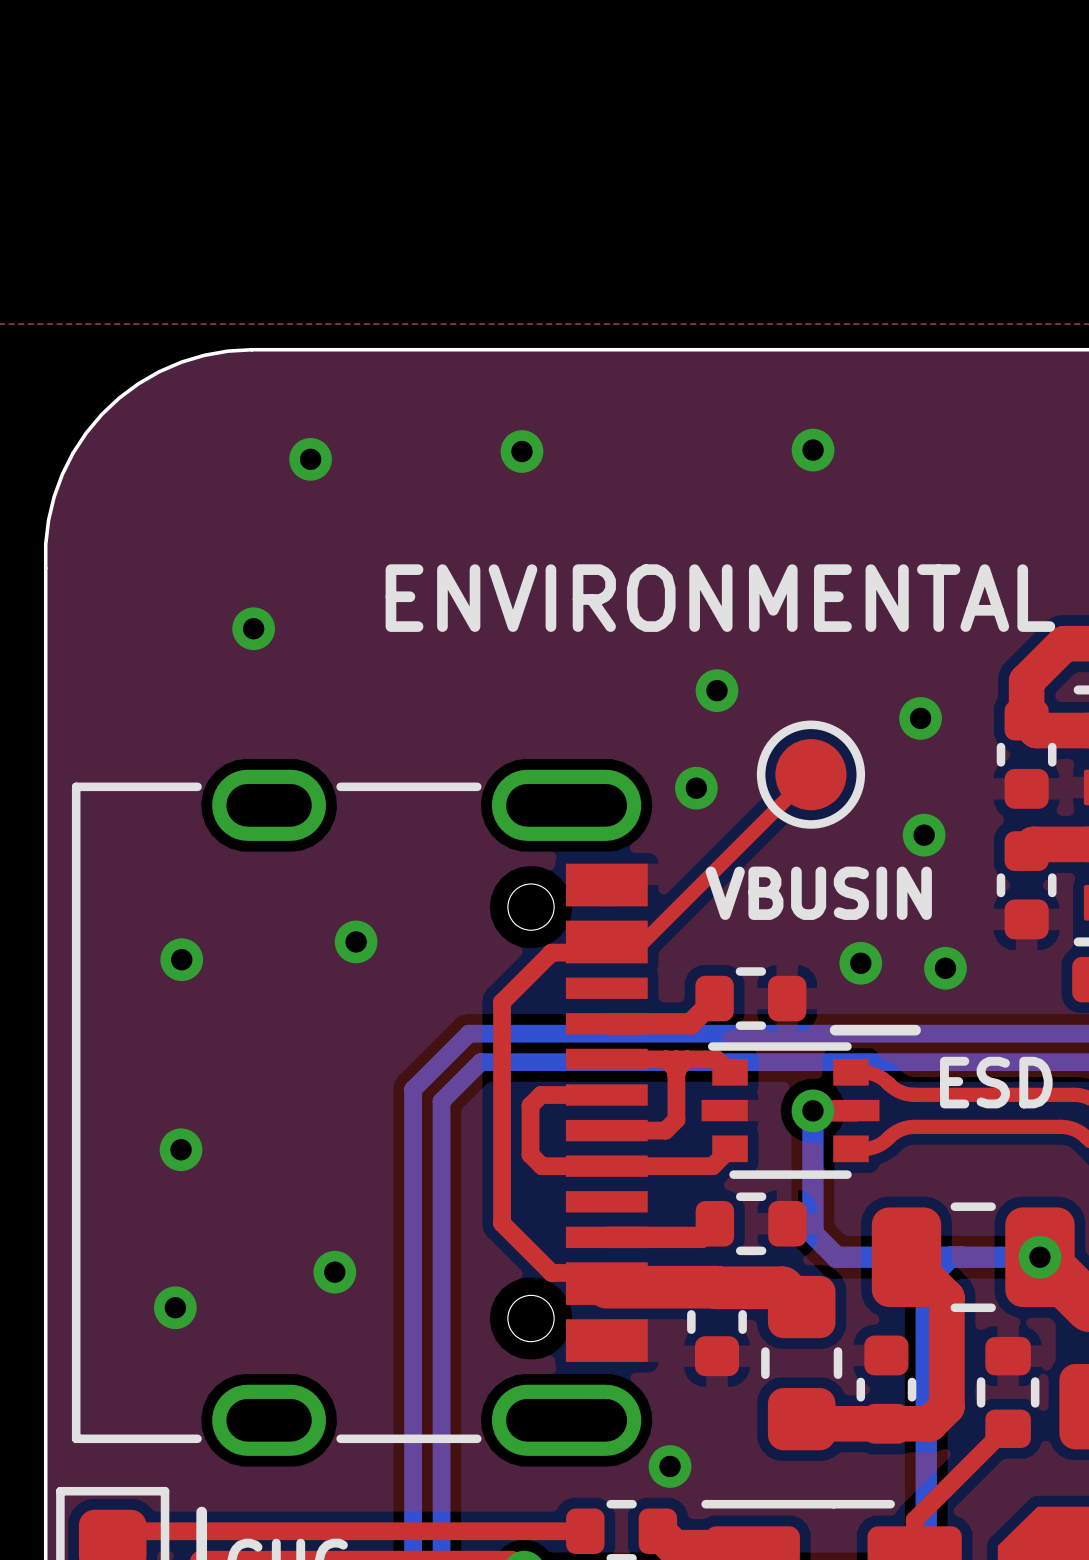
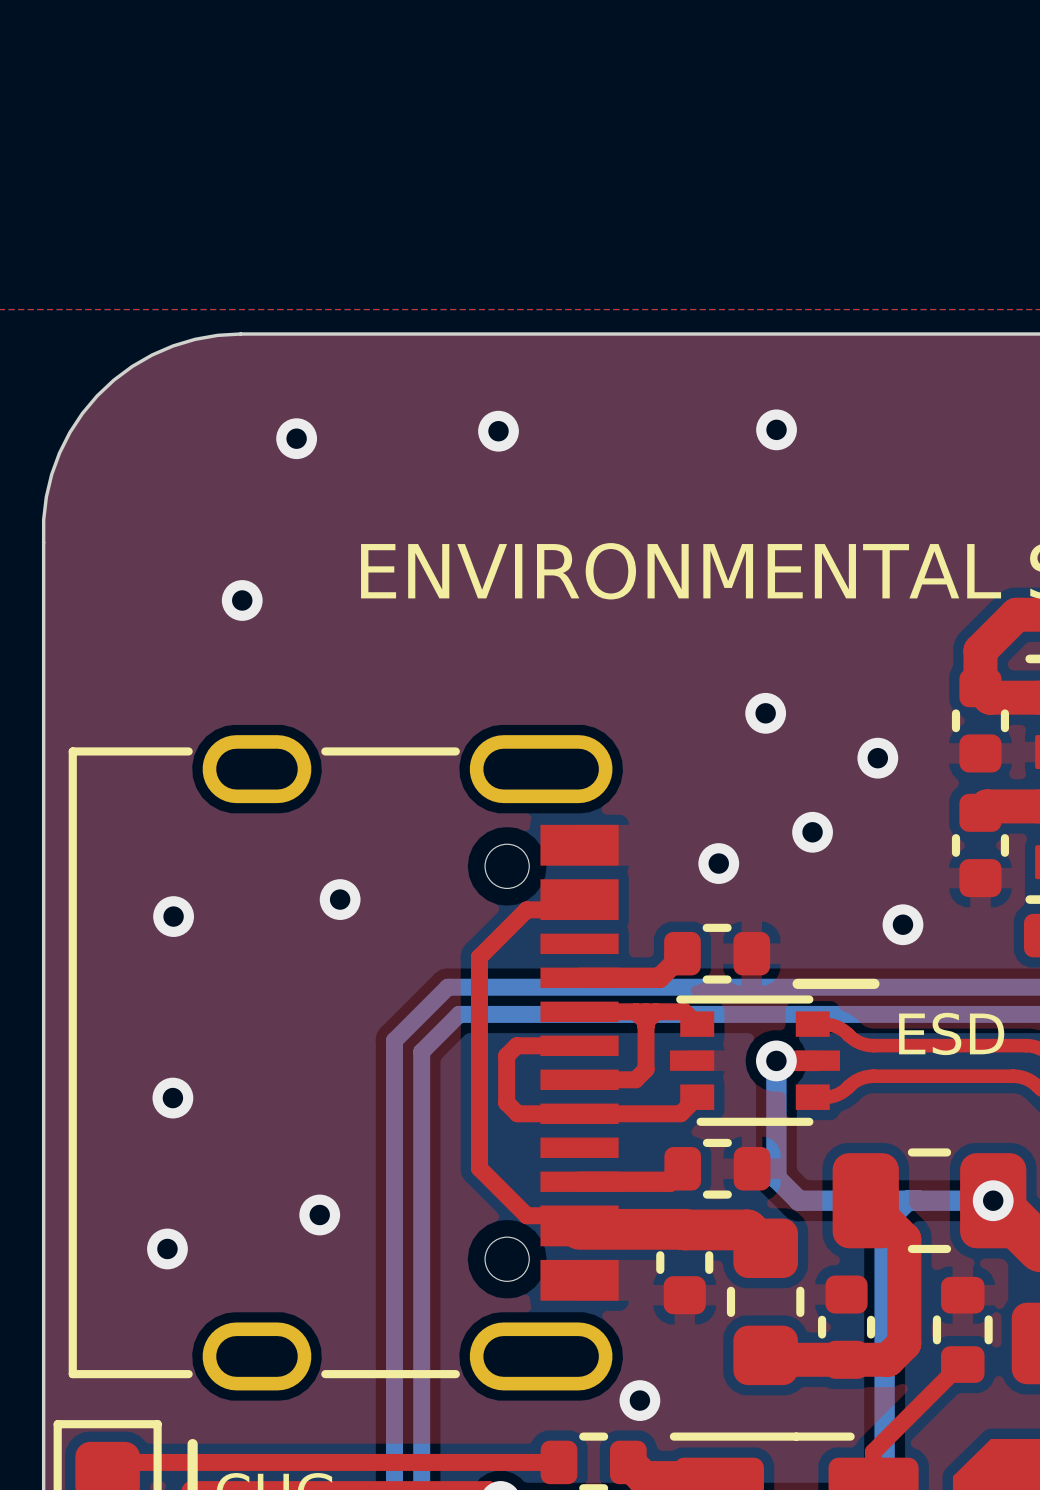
via: (717, 690) -> none
via: (920, 718) -> none
via: none -> (765, 713)
top track: (810, 774) (632, 952) (606, 952) -> none
part: (810, 774) -> none
via: (696, 788) -> none
via position: (924, 835) -> (877, 758)
via: none -> (812, 832)
text: VBUSIN (818, 893) -> none
via: none -> (718, 863)
via: (860, 963) -> none

